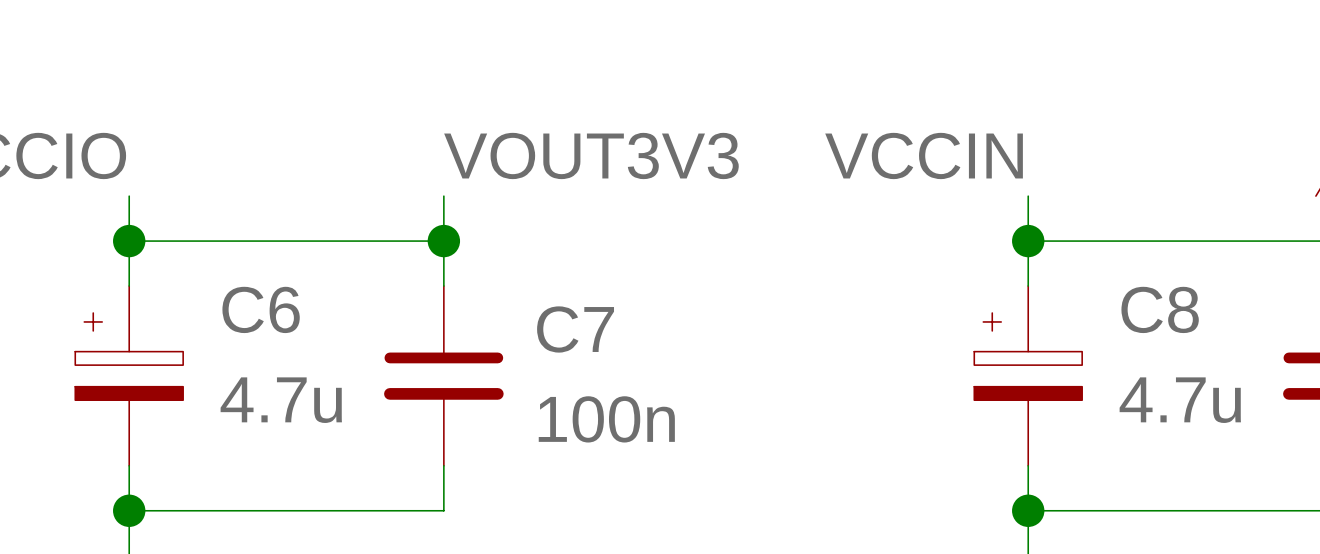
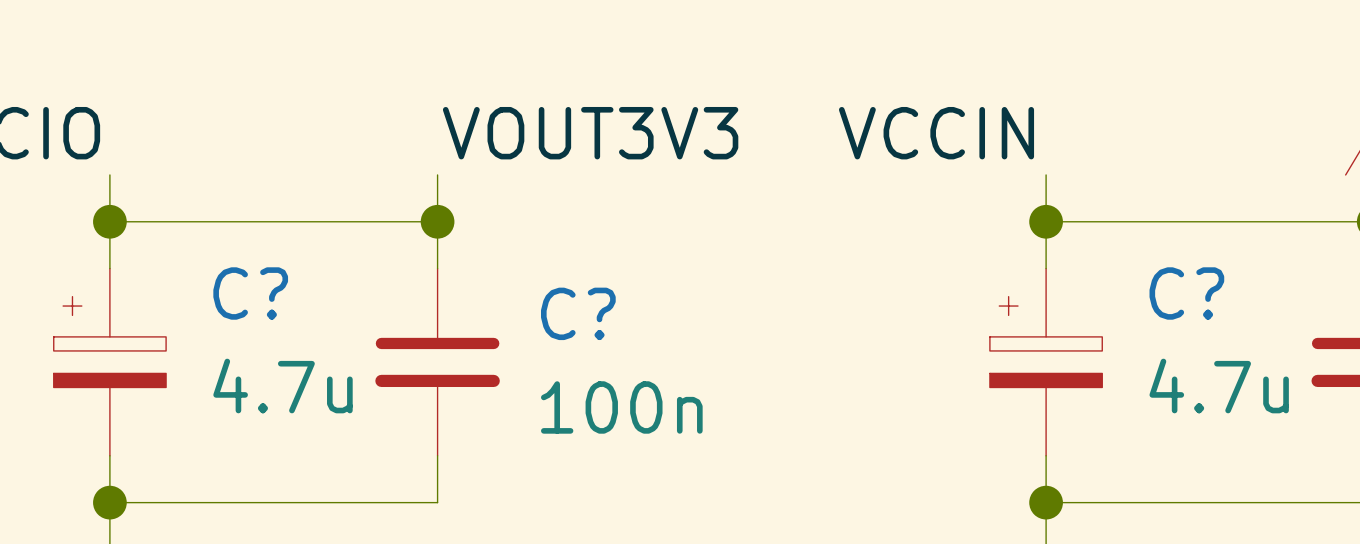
C6 name: C6 (261, 309) -> C? (250, 293)
C8 name: C8 (1160, 309) -> C? (1186, 293)
C7 name: C7 (575, 329) -> C? (578, 313)

